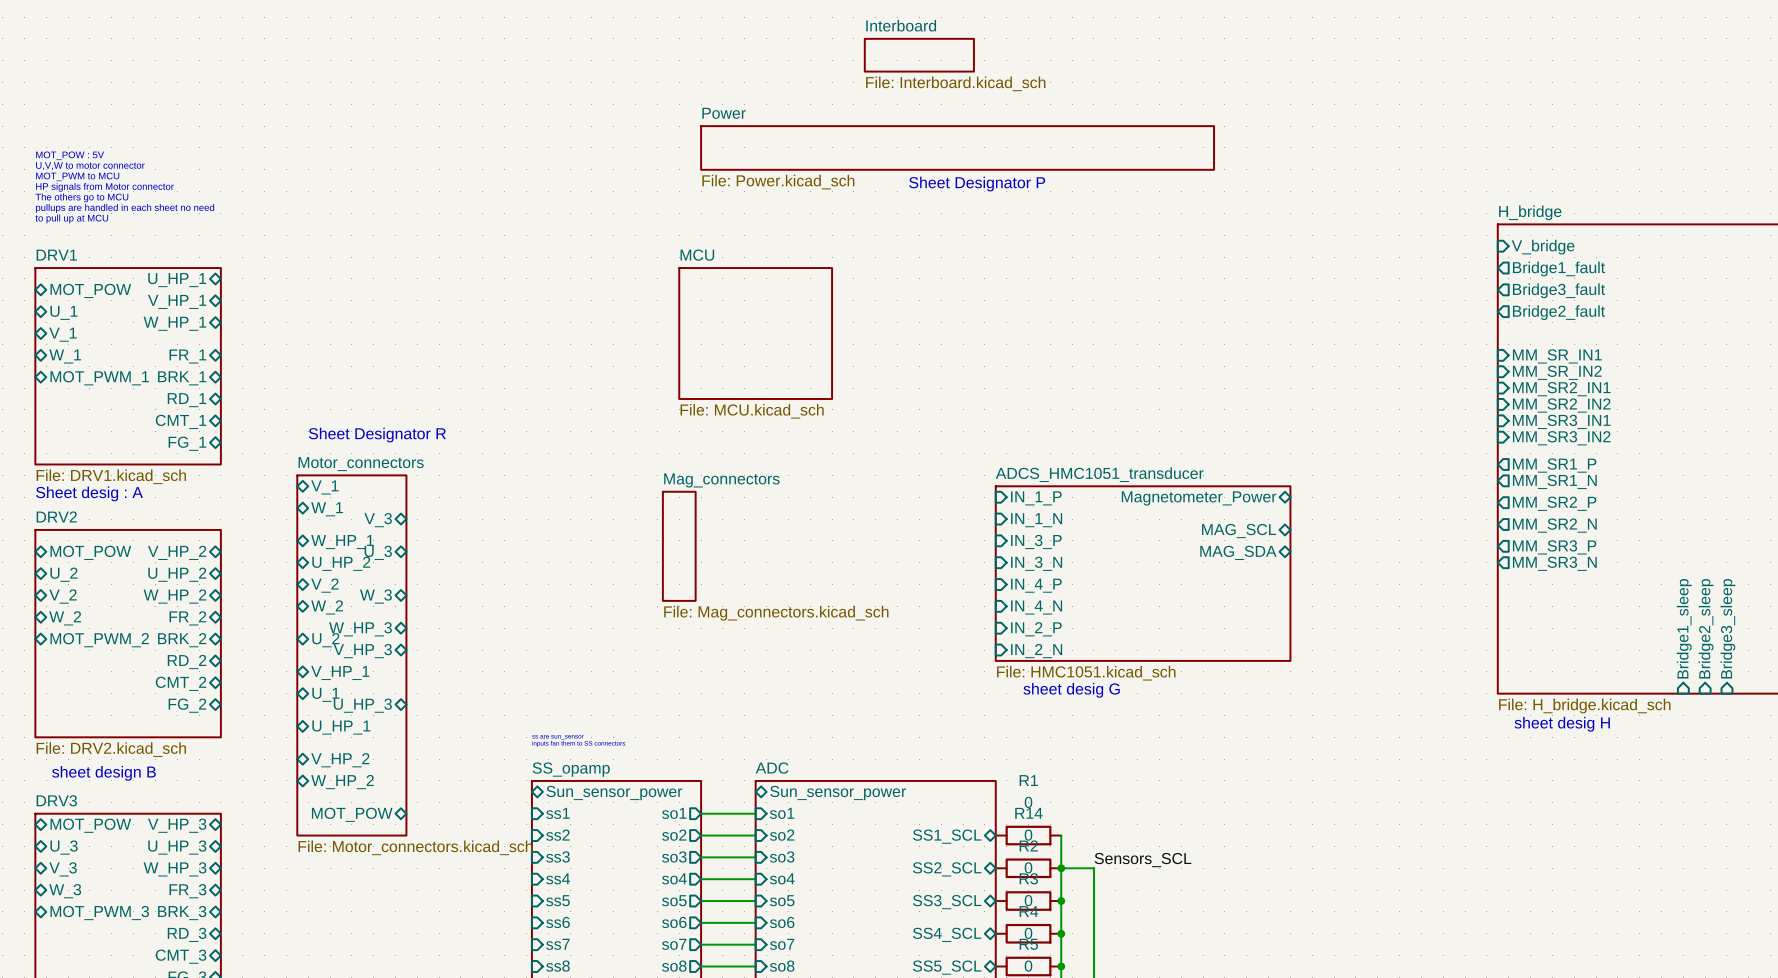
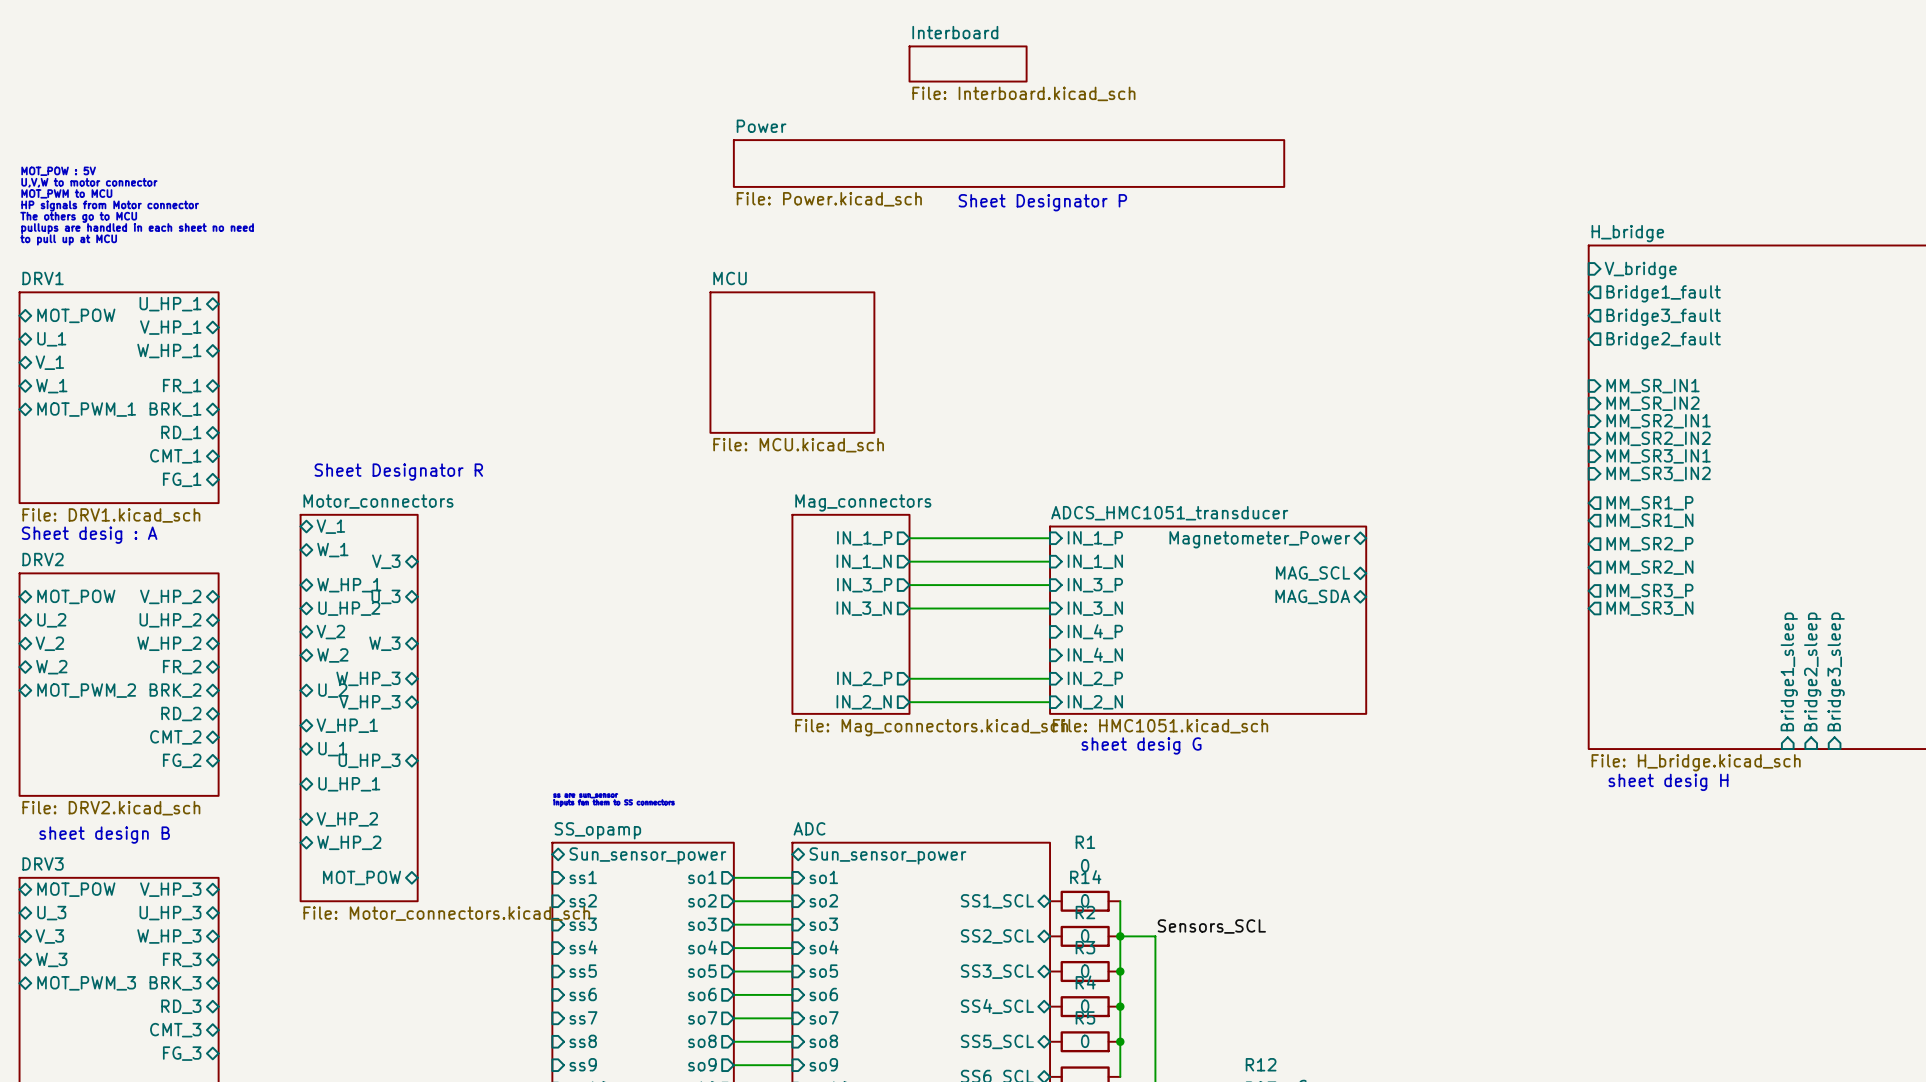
wire: none -> (909, 538) (1050, 538)
sheet pin: none -> IN_1_P (864, 538)
wire: none -> (909, 561) (1050, 561)
sheet pin: none -> IN_1_N (864, 561)
wire: none -> (909, 585) (1050, 585)
sheet pin: none -> IN_3_P (864, 585)
sheet Mag_connectors: File: Mag_connectors.kicad_sch (679, 546) -> none
wire: none -> (909, 608) (1050, 608)
sheet pin: none -> IN_3_N (864, 608)
sheet Mag_connectors: none -> File: Mag_connectors.kicad_sch (850, 614)
wire: none -> (909, 678) (1050, 678)
sheet pin: none -> IN_2_P (864, 678)
wire: none -> (909, 702) (1050, 702)
sheet pin: none -> IN_2_N (864, 702)

